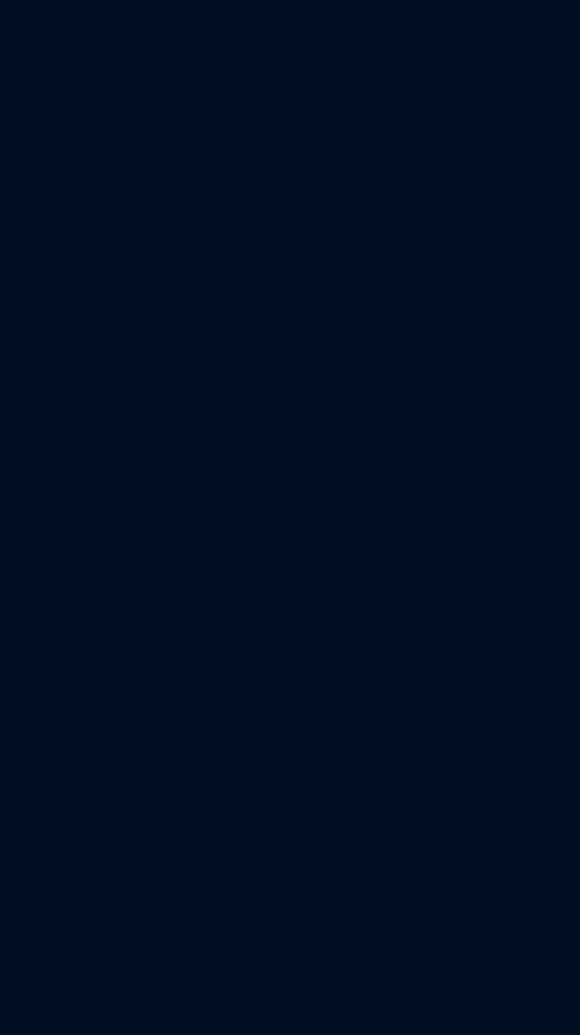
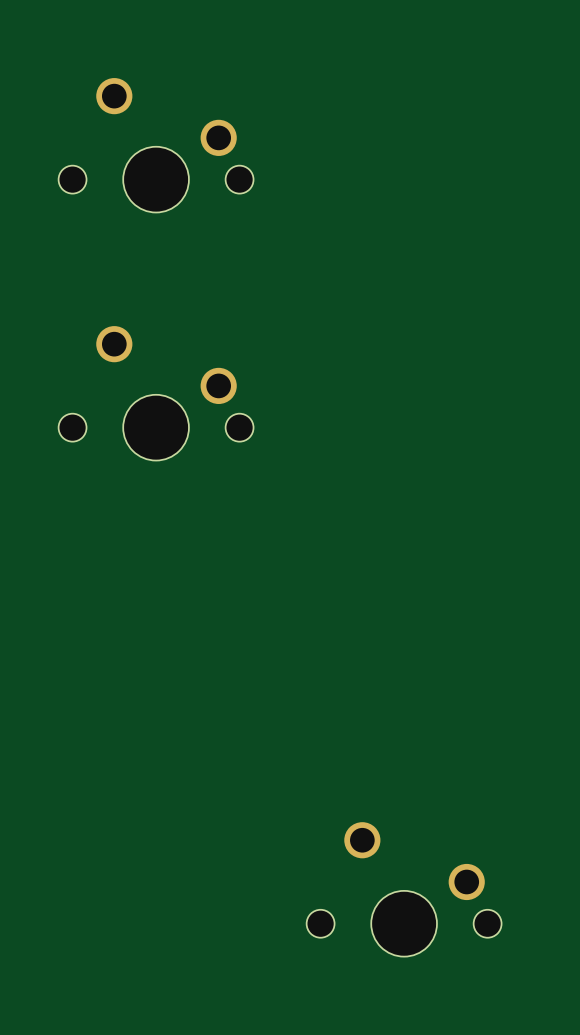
part: none -> (156, 145)
part: none -> (156, 393)
part: none -> (404, 889)

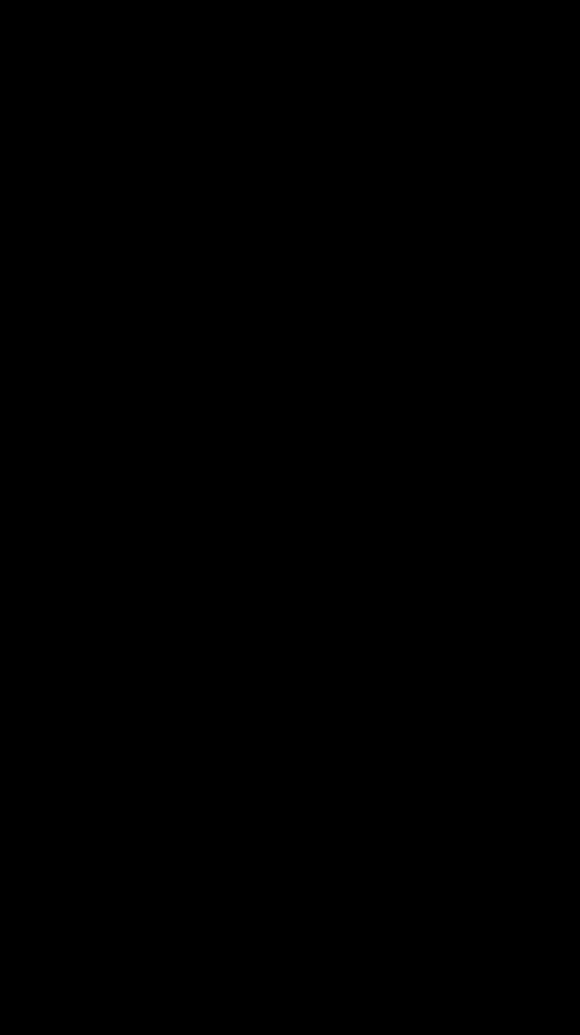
part: (156, 145) -> none
part: (156, 393) -> none
part: (404, 889) -> none

